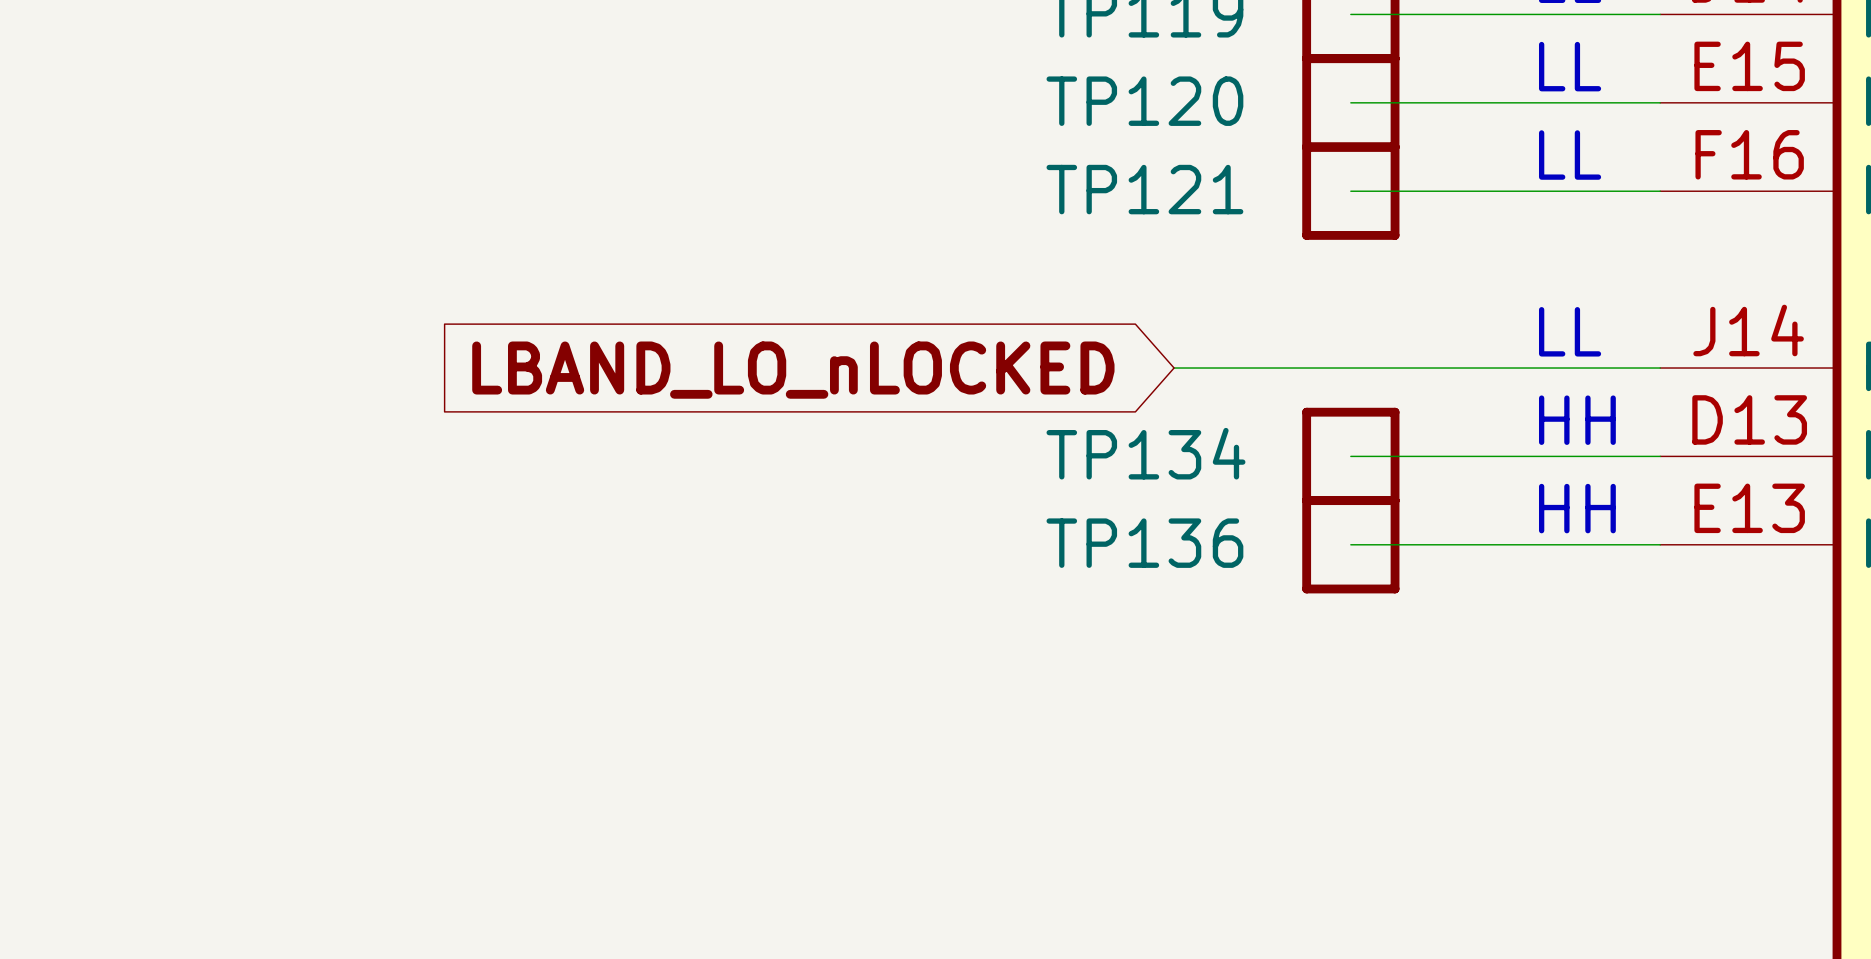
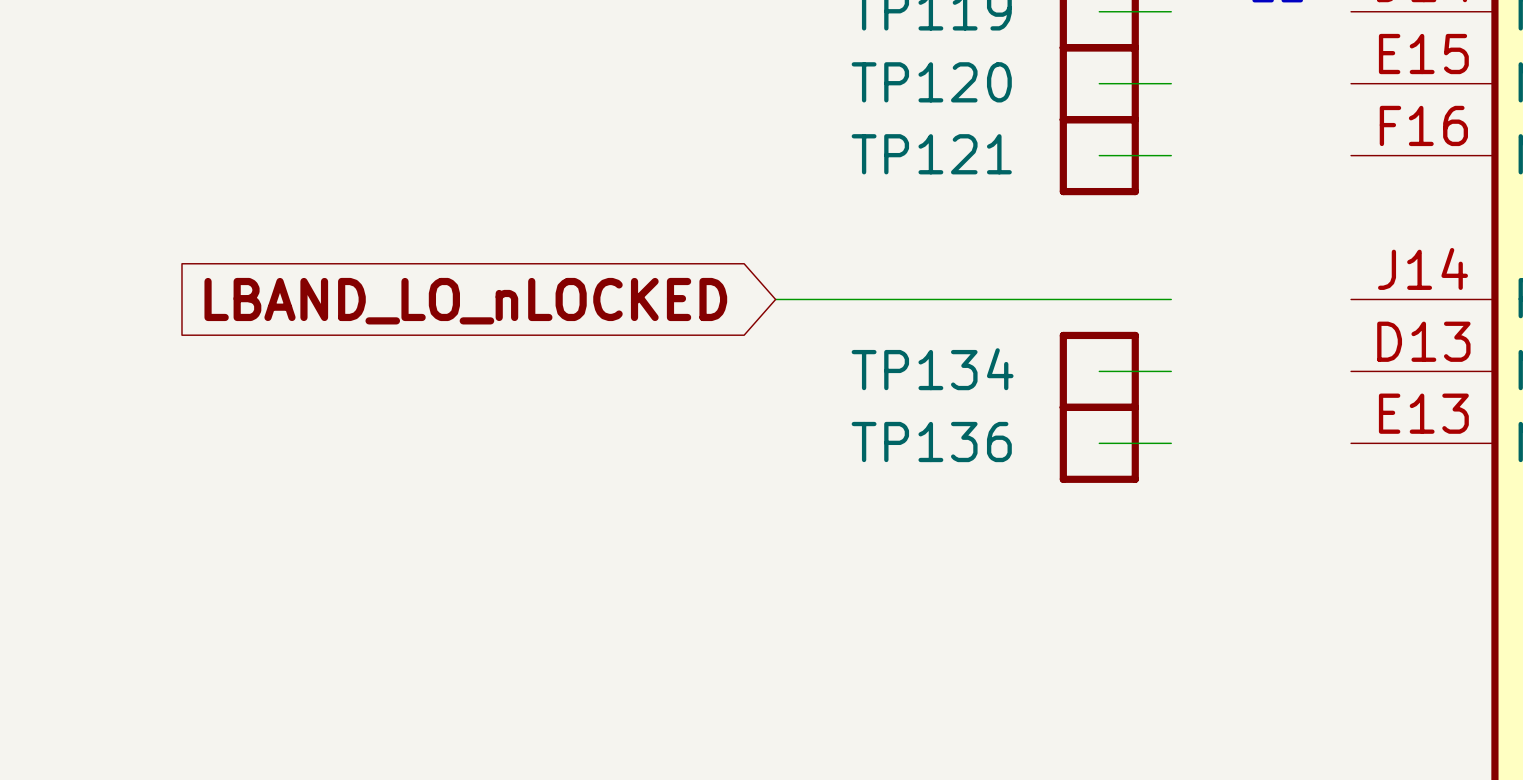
wire: (1439, 14) (1660, 14) -> none
text: LL (1570, 66) -> none
wire: (1439, 102) (1660, 102) -> none
text: LL (1570, 155) -> none
wire: (1439, 191) (1660, 191) -> none
text: LL (1570, 331) -> none
wire: (1439, 368) (1660, 368) -> (775, 299) (955, 299)
global label position: LBAND_LO_nLOCKED (793, 370) -> LBAND_LO_nLOCKED (465, 301)
text: HH (1577, 420) -> none
wire: (1439, 456) (1660, 456) -> none
text: HH (1577, 508) -> none
wire: (1439, 544) (1660, 544) -> none

